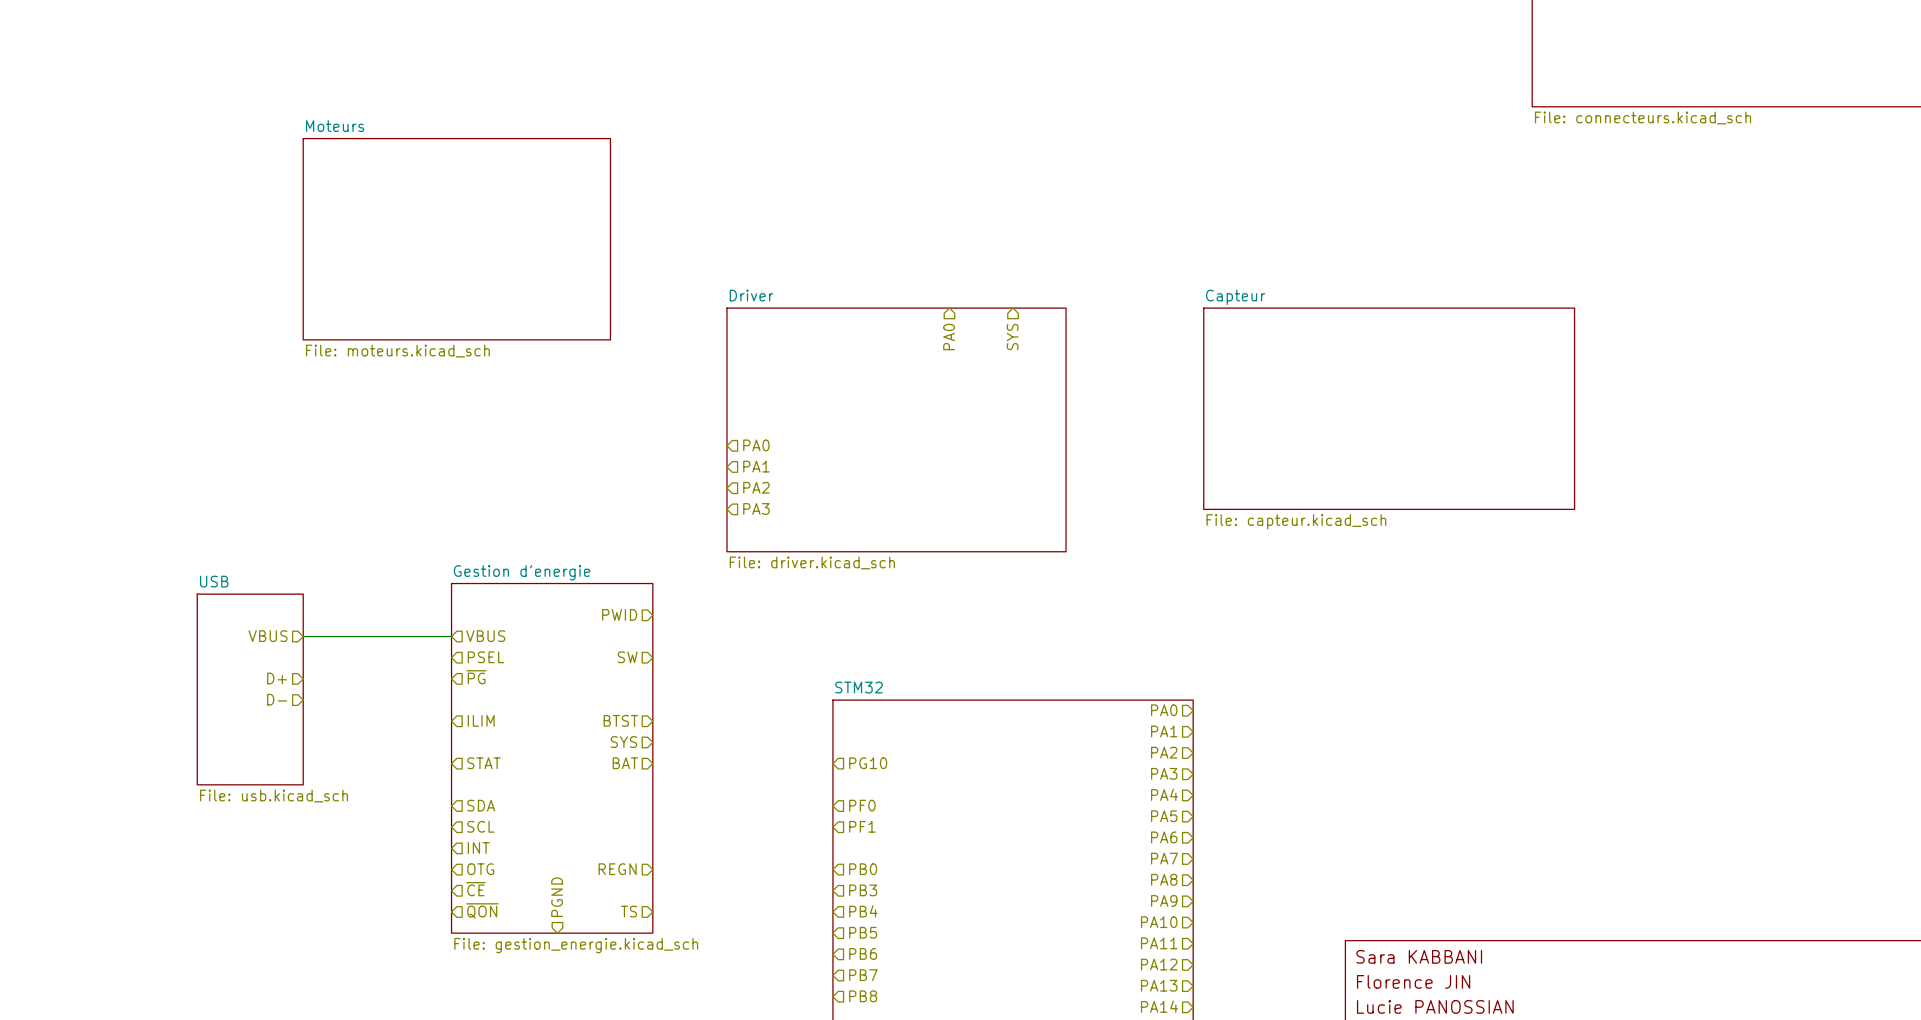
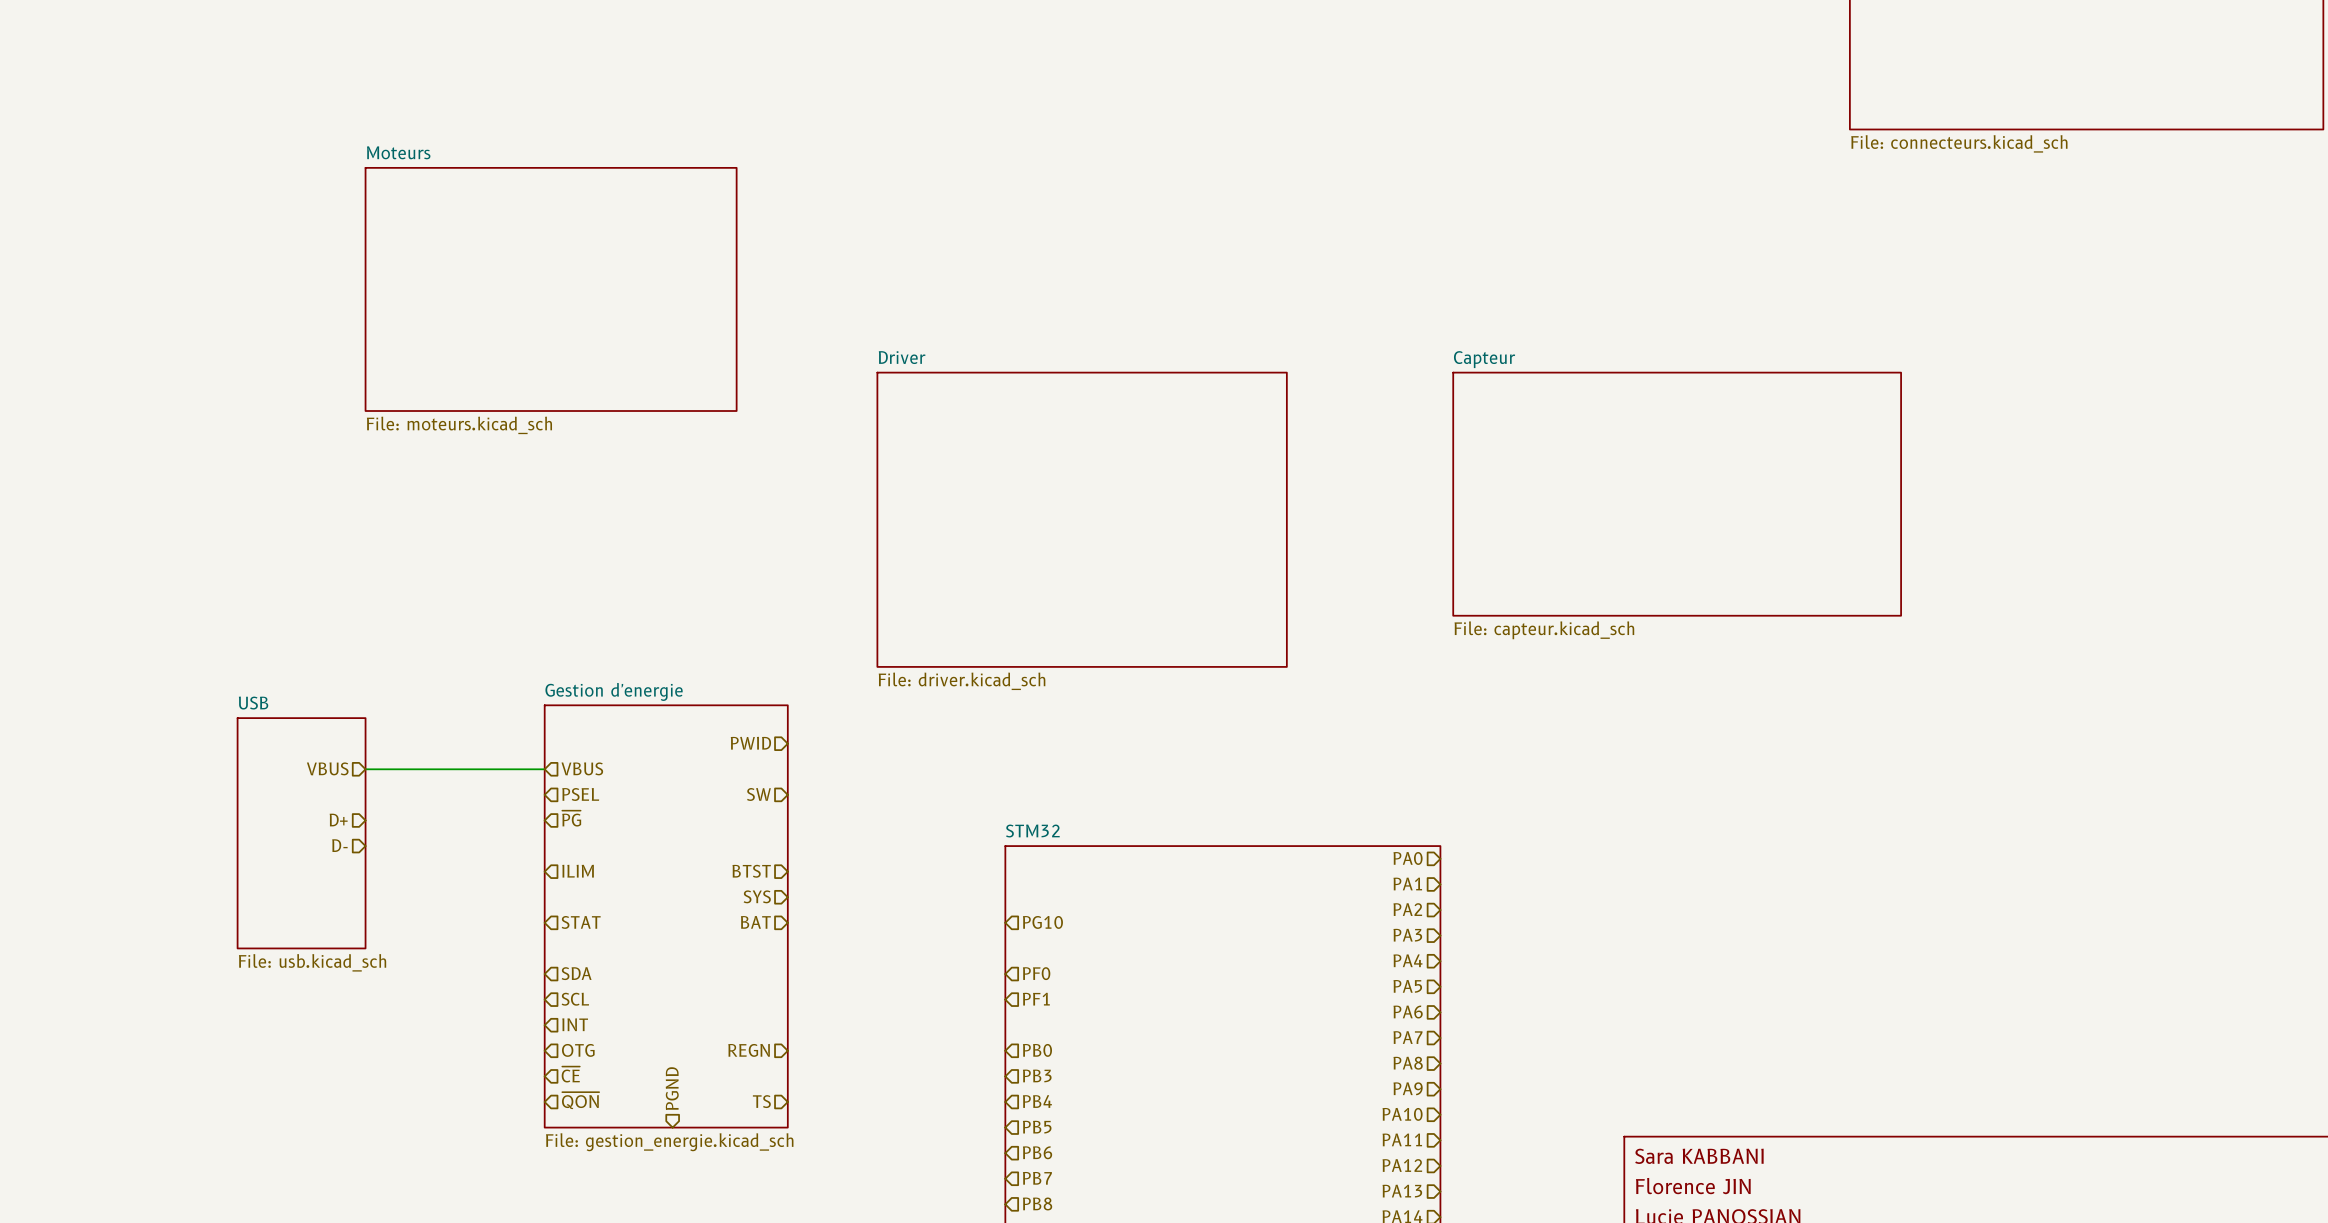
hierarchical label: PA0 (949, 337) -> none
hierarchical label: SYS (1012, 337) -> none
hierarchical label: PA0 (756, 445) -> none
hierarchical label: PA1 (756, 466) -> none
hierarchical label: PA2 (756, 487) -> none
hierarchical label: PA3 (756, 508) -> none

